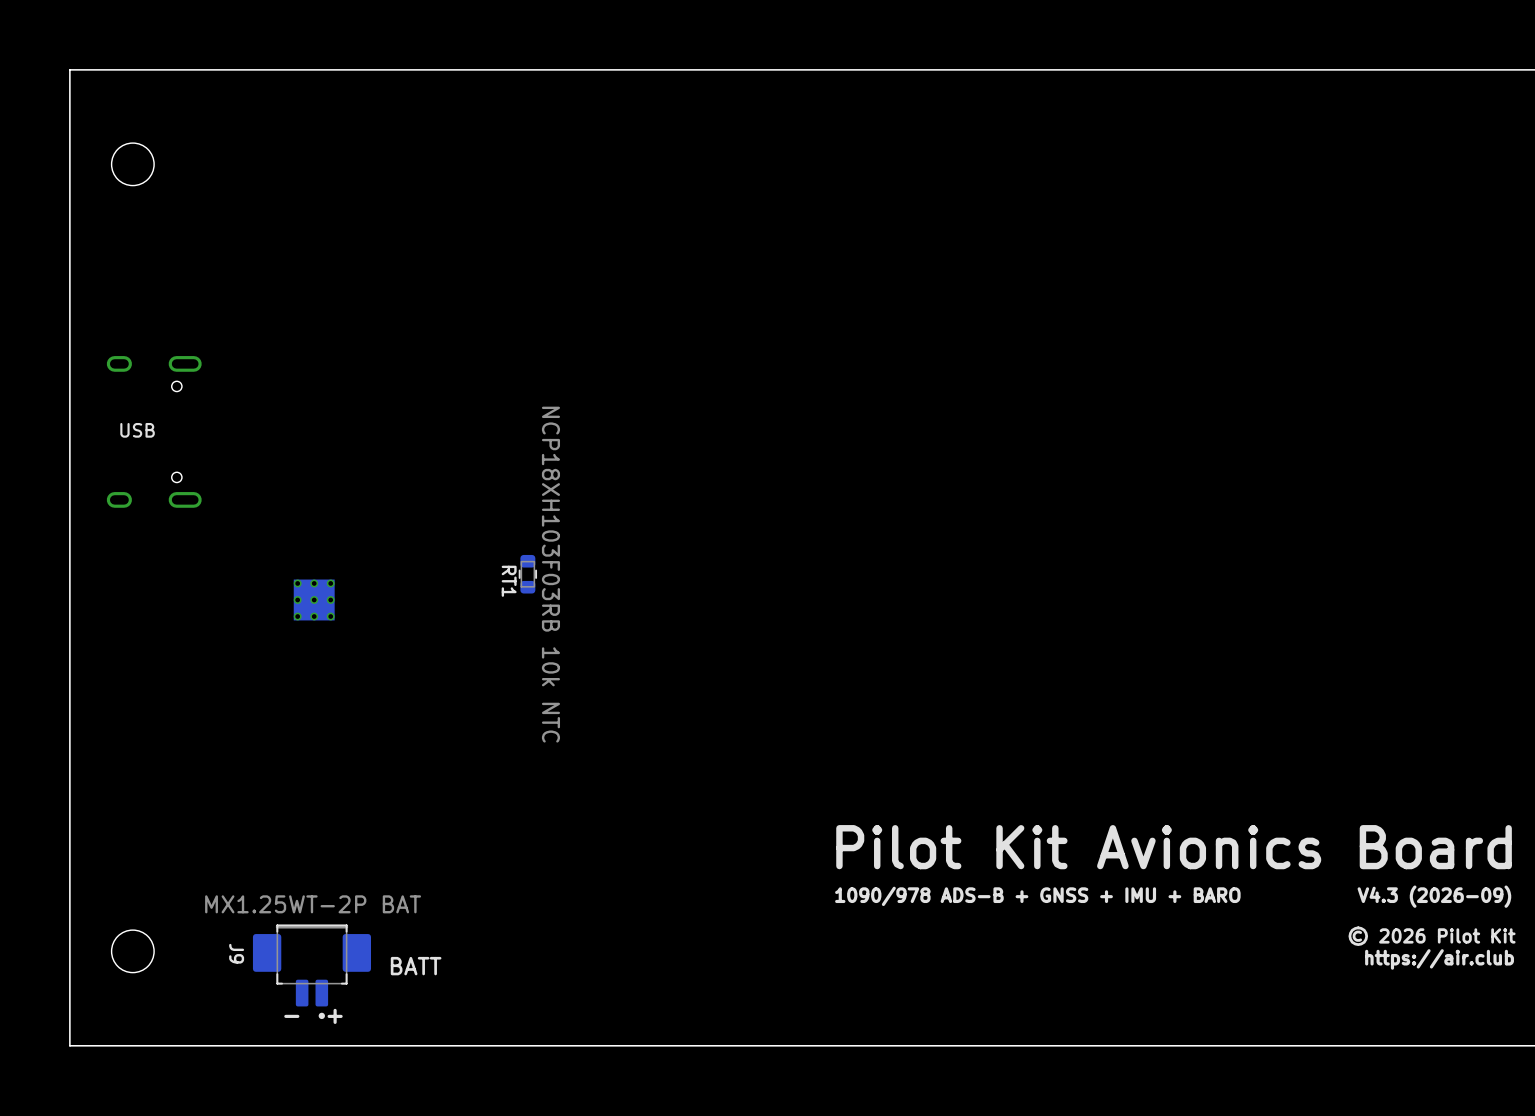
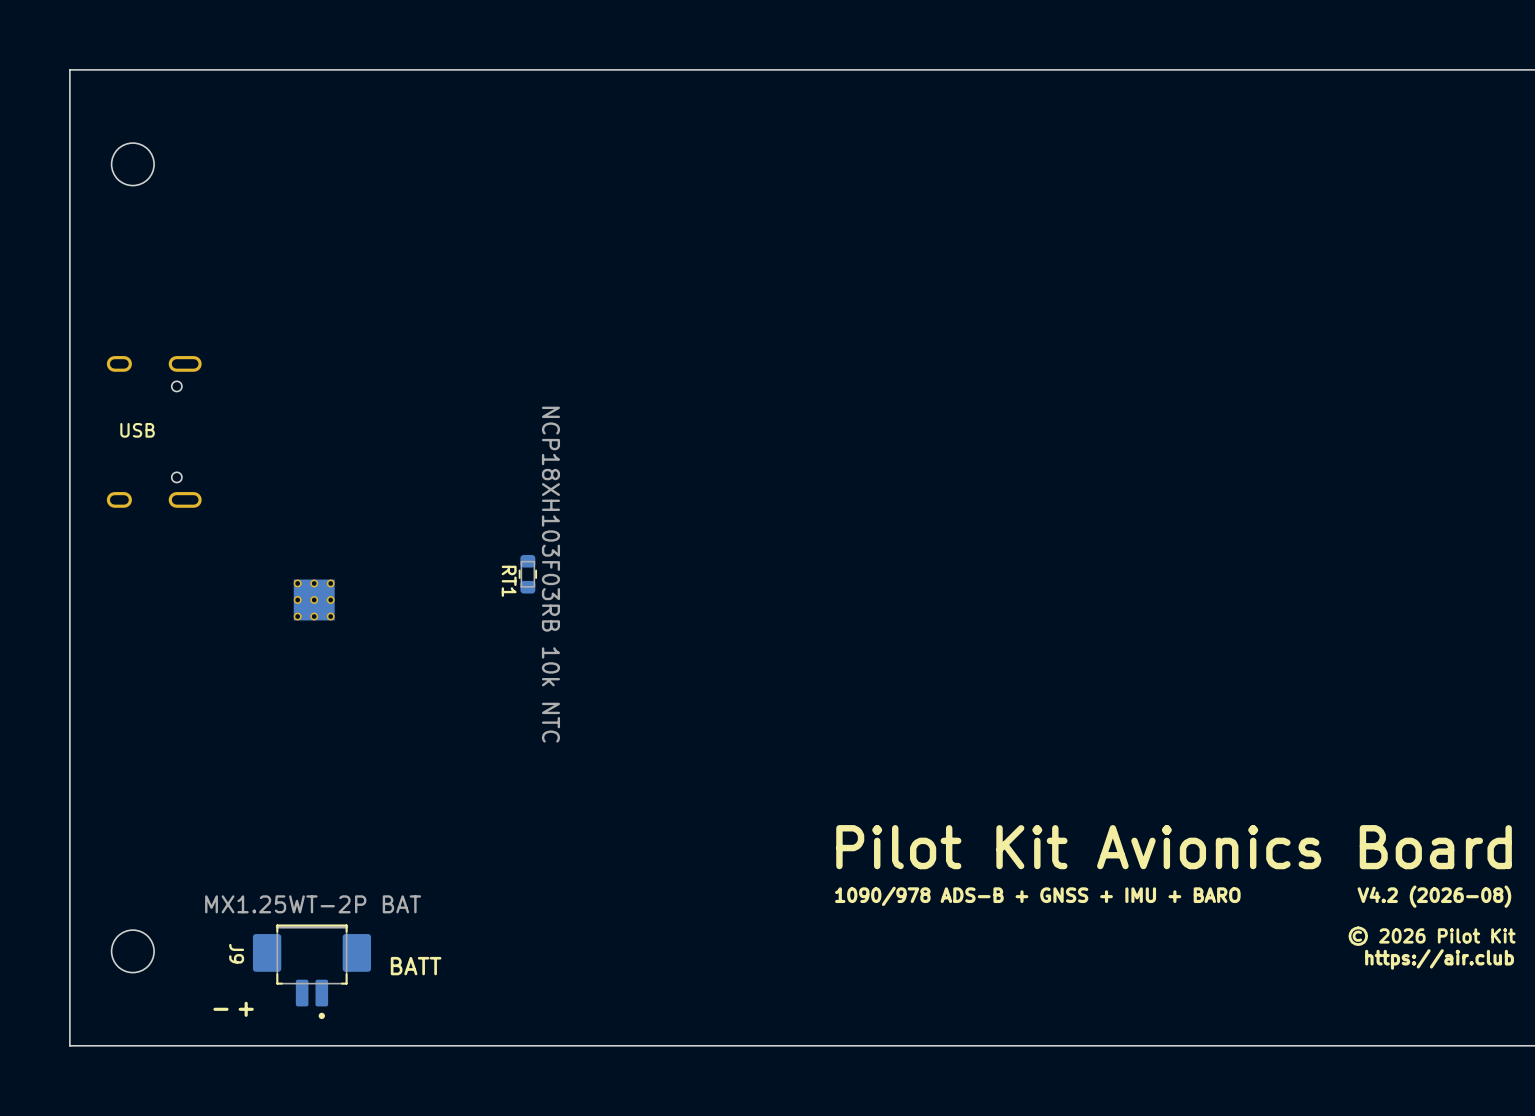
text: V4.3 (2026-09) (1434, 896) -> V4.2 (2026-08) (1434, 896)
text position: - (291, 1016) -> - (220, 1009)
text position: + (335, 1016) -> + (246, 1009)

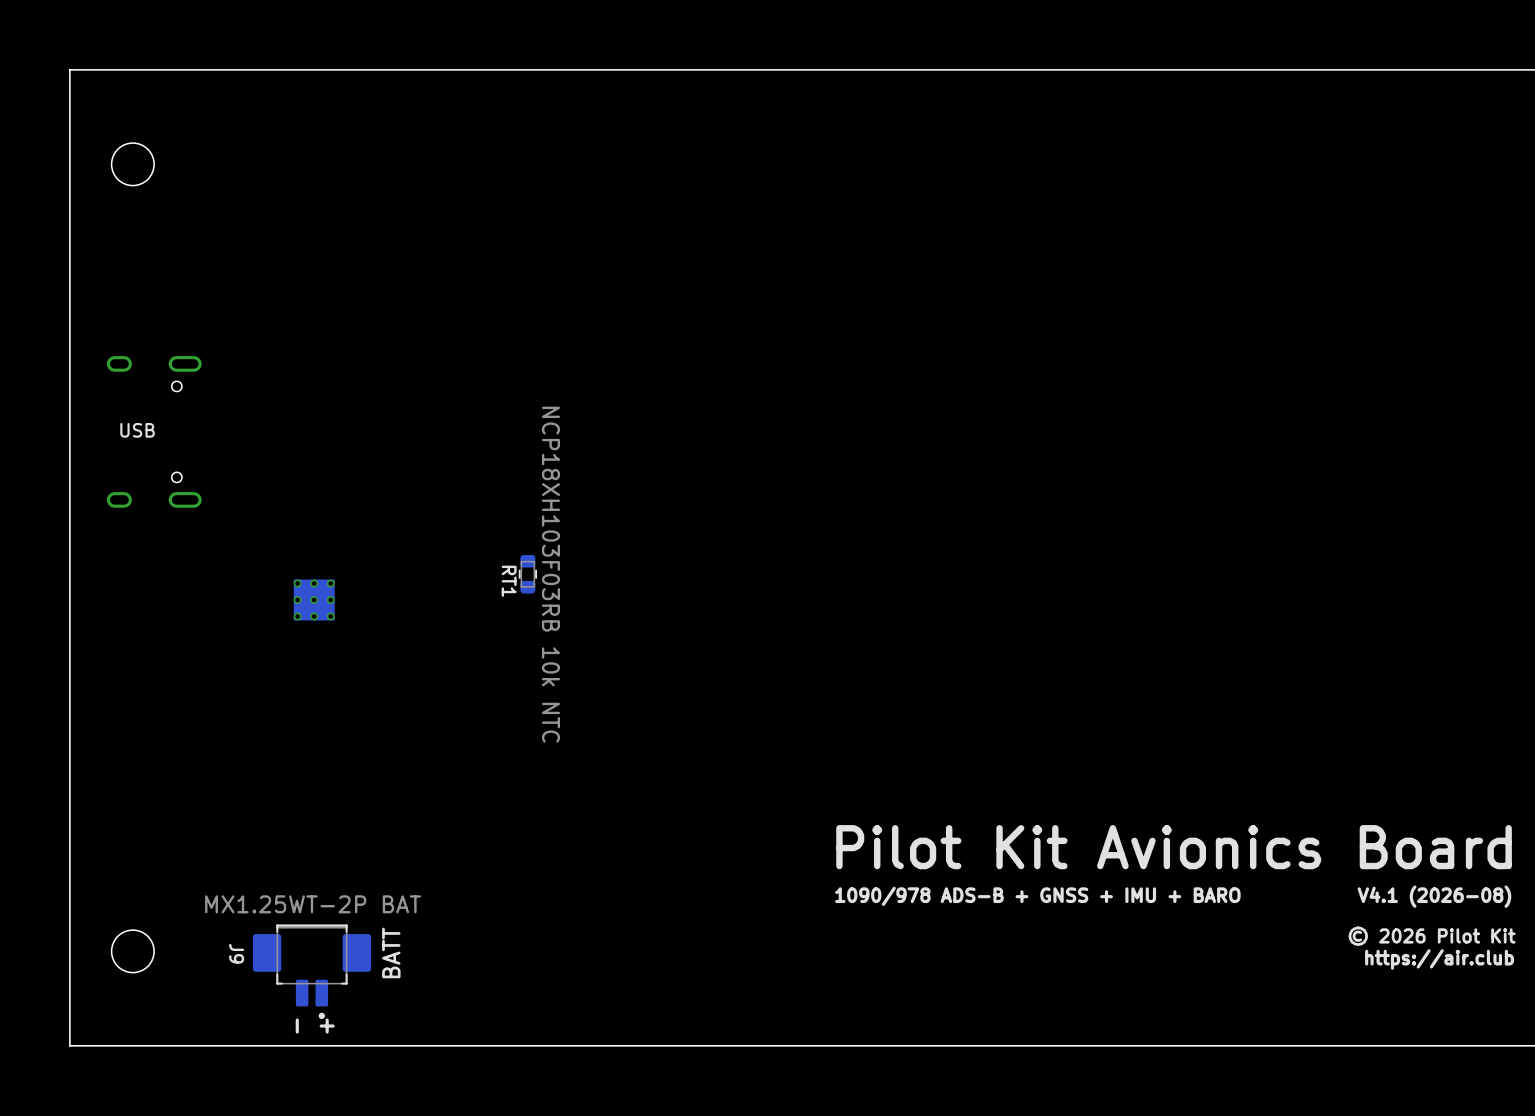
text: V4.2 (2026-08) (1434, 896) -> V4.1 (2026-08) (1434, 896)
text rotation: 0° (416, 966) -> 90° counterclockwise (391, 952)
text rotation: 0° (220, 1009) -> 90° counterclockwise (297, 1026)
text position: - (220, 1009) -> - (297, 1026)
text rotation: 0° (246, 1009) -> 90° counterclockwise (327, 1026)
text position: + (246, 1009) -> + (327, 1026)

